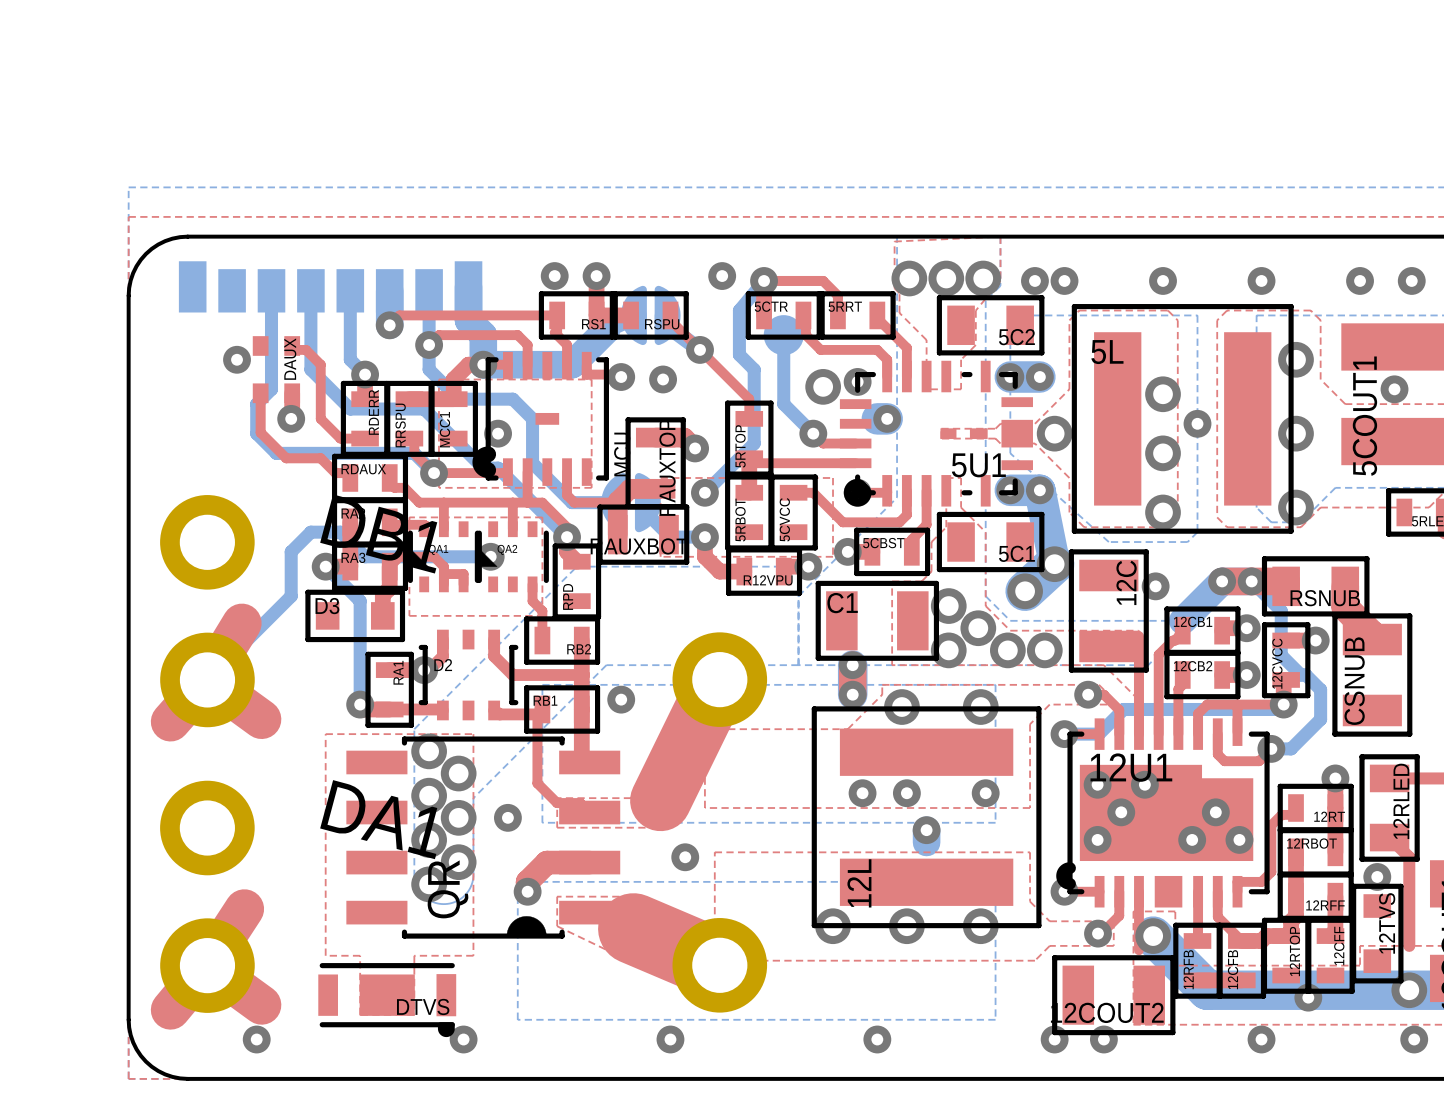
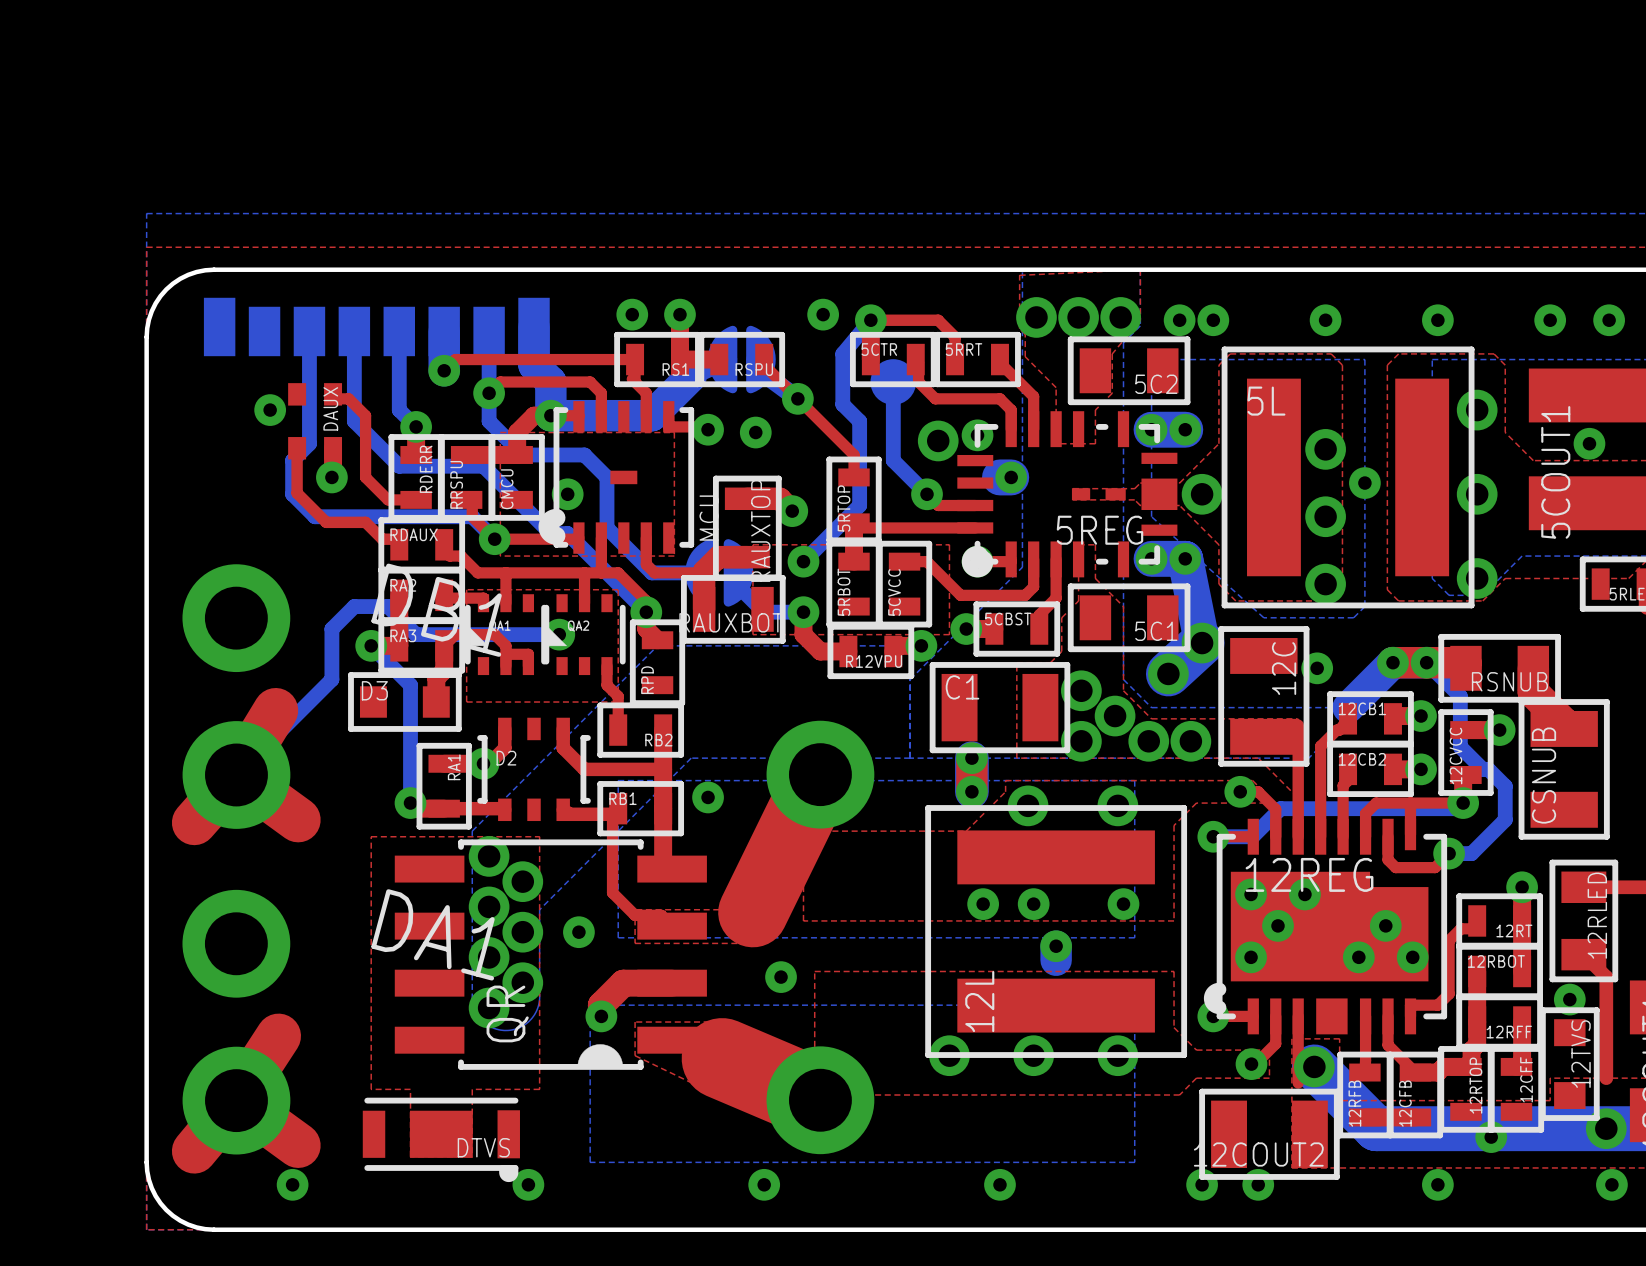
MCC1 name: MCC1 (444, 429) -> CMCU (507, 489)
5U1 name: 5U1 (978, 465) -> 5REG (1100, 530)
12U1 name: 12U1 (1131, 767) -> 12REG (1309, 874)

